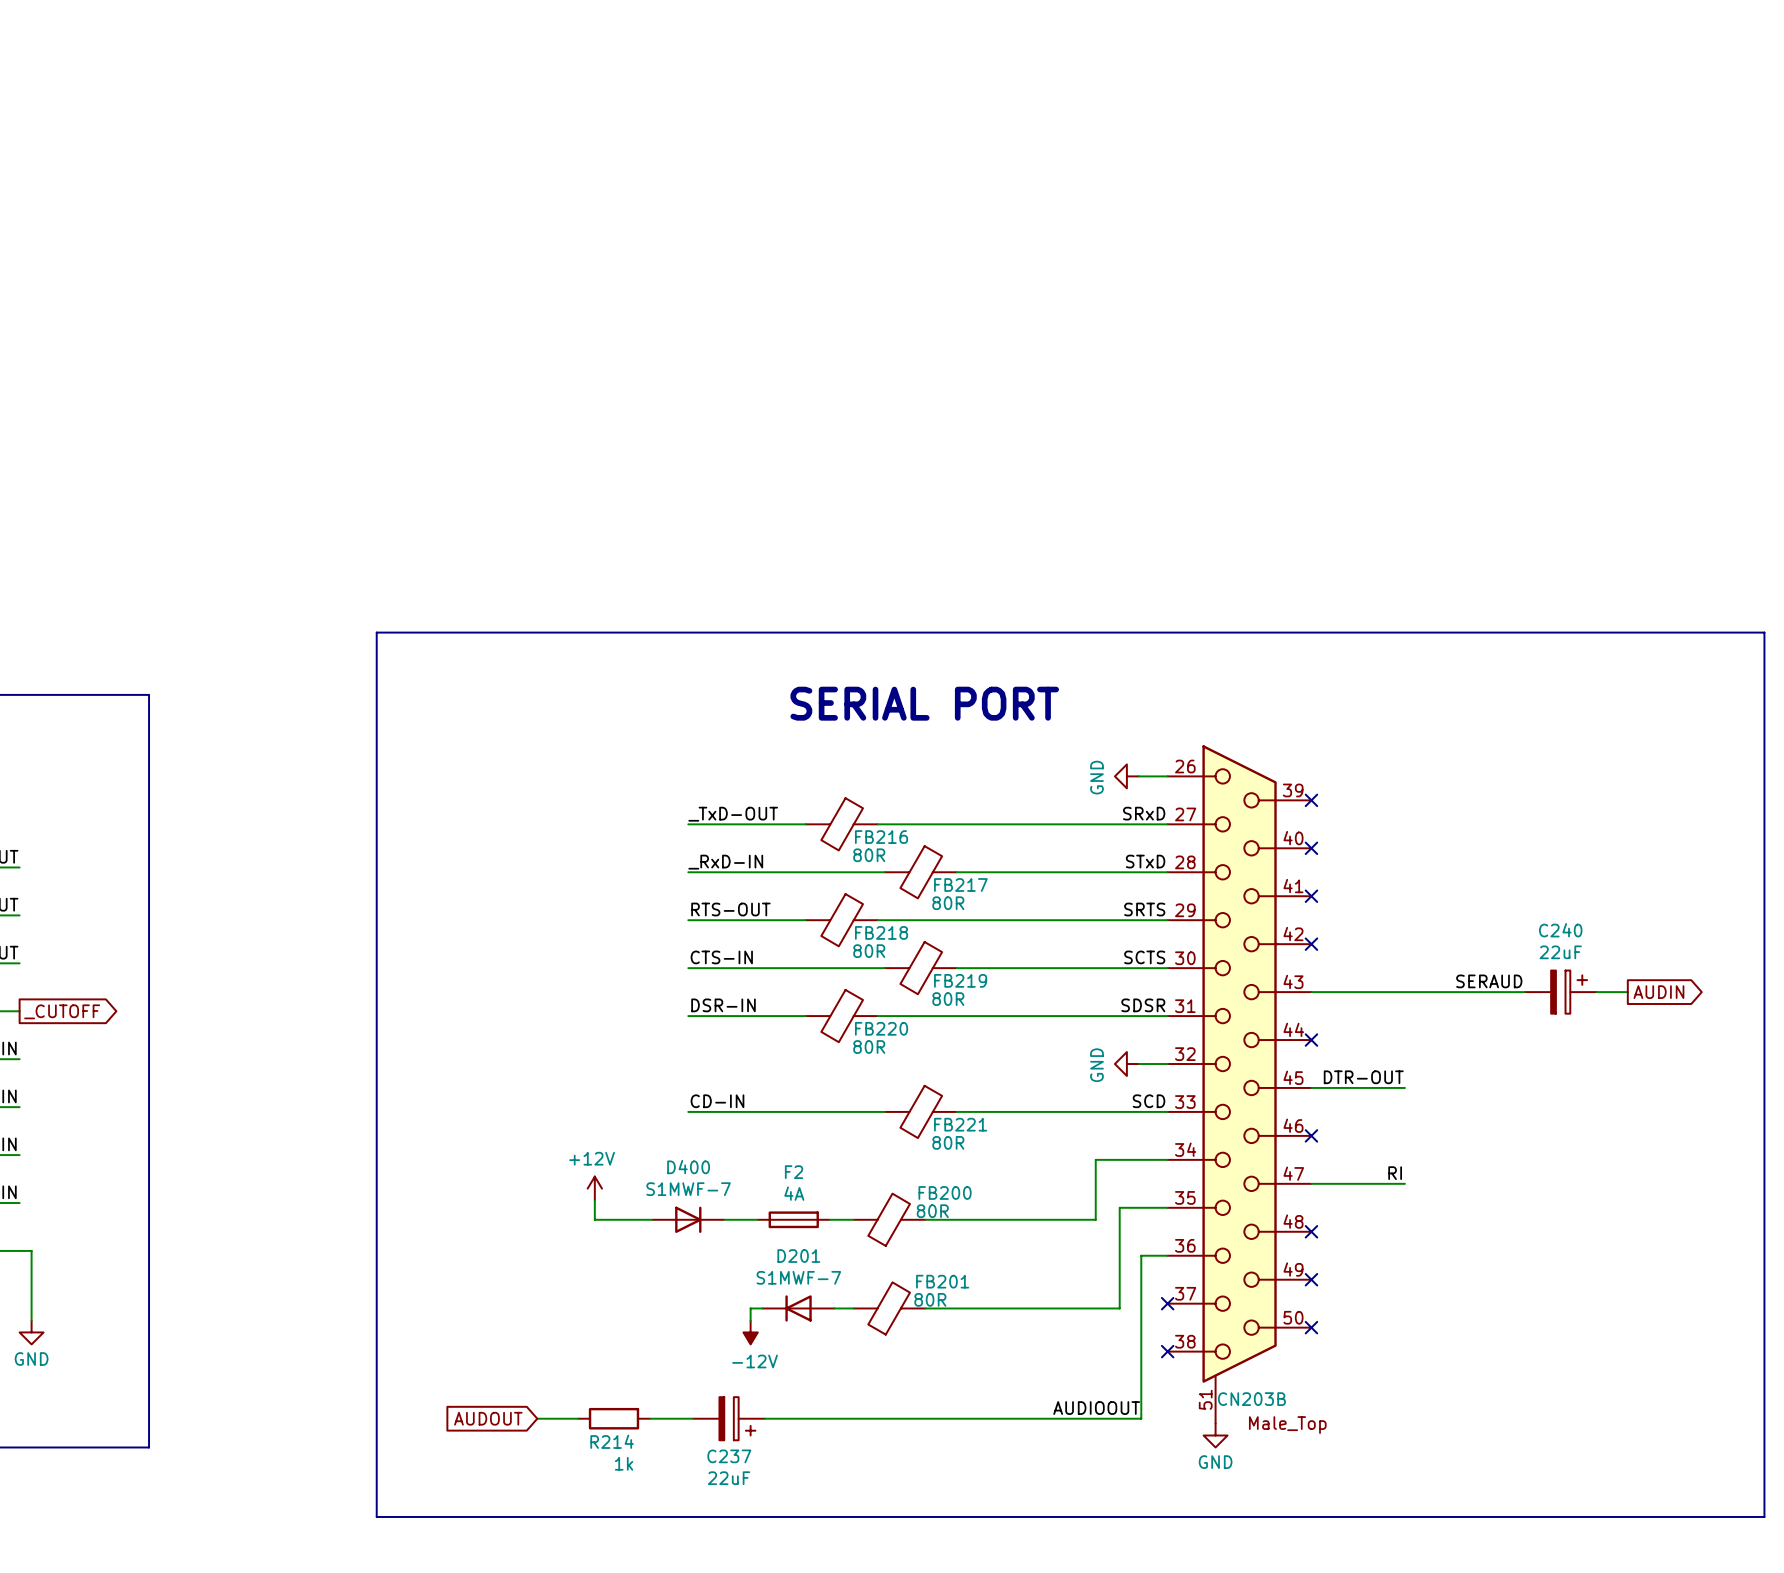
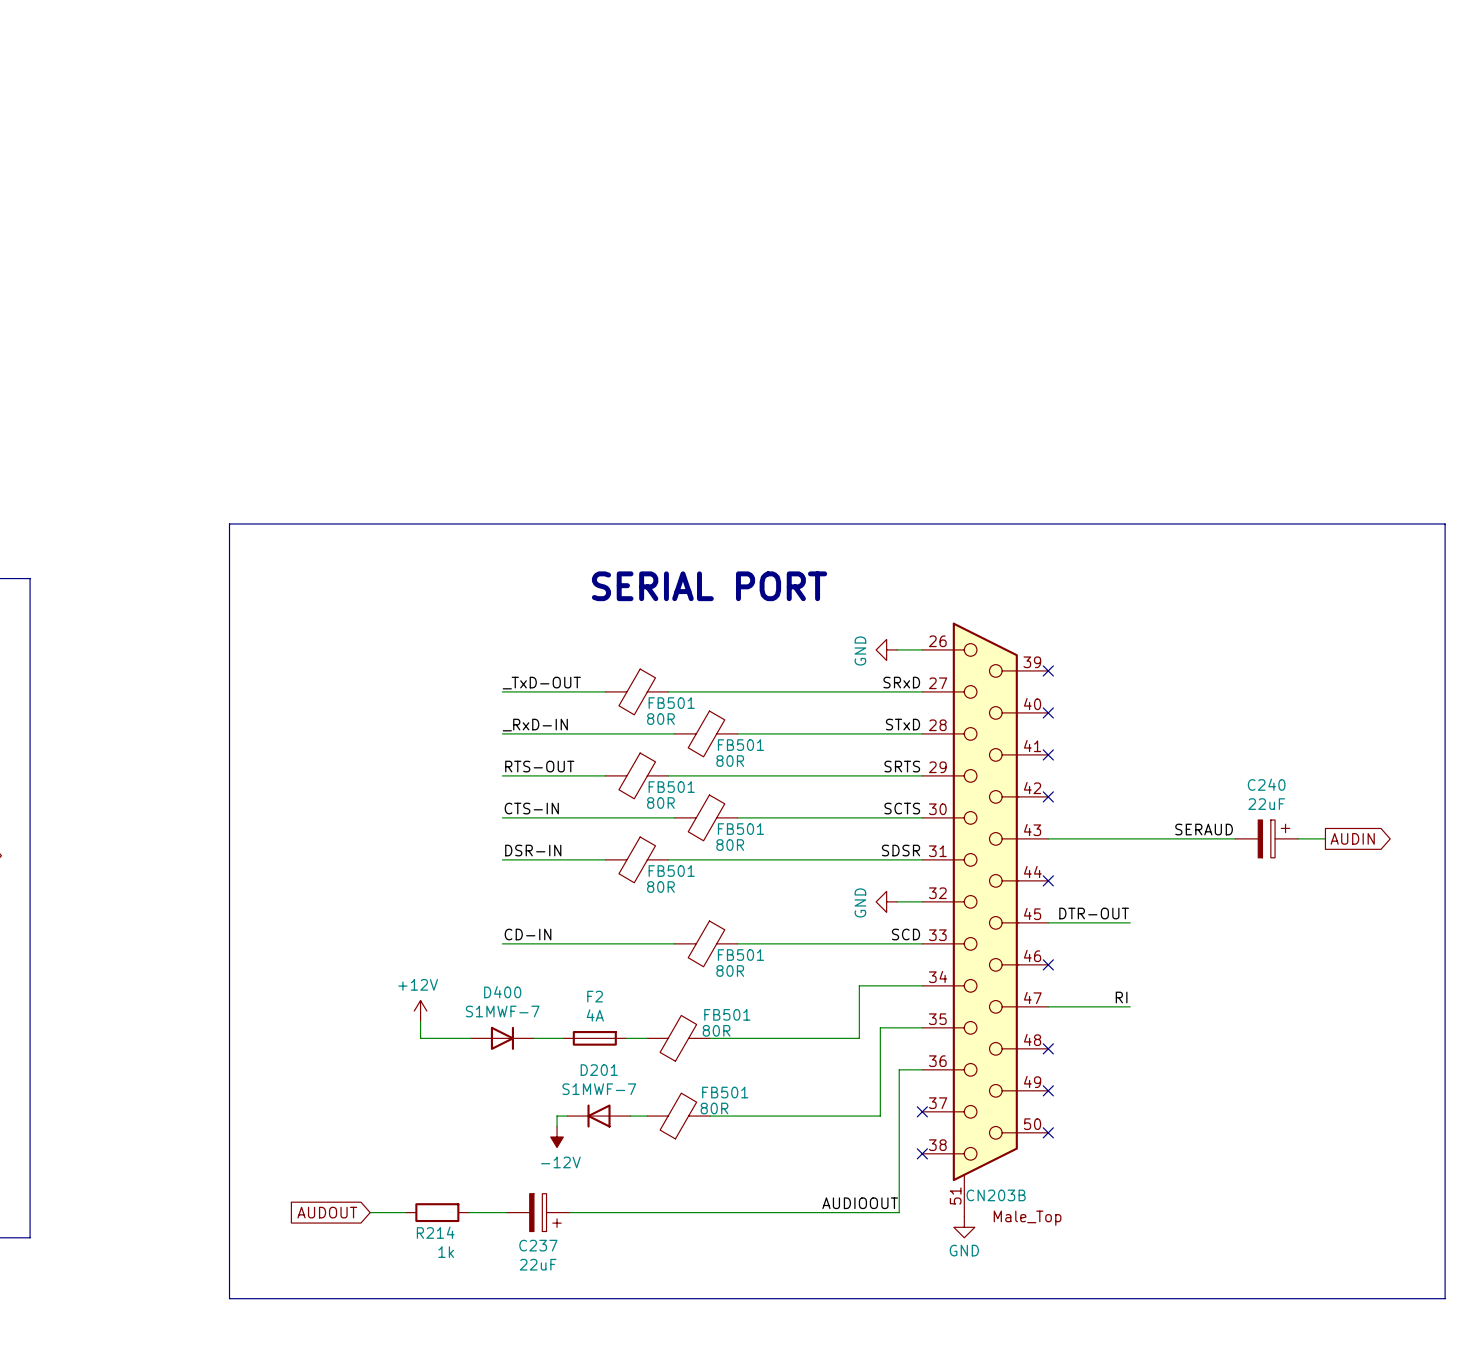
FB216 name: FB216 (881, 837) -> FB501 (671, 703)
FB217 name: FB217 (960, 885) -> FB501 (740, 745)
FB218 name: FB218 (881, 932) -> FB501 (671, 787)
FB219 name: FB219 (960, 980) -> FB501 (740, 829)
FB220 name: FB220 (881, 1028) -> FB501 (671, 871)
FB221 name: FB221 (960, 1124) -> FB501 (740, 955)
FB200 name: FB200 (945, 1192) -> FB501 (727, 1014)
FB201 name: FB201 (942, 1281) -> FB501 (725, 1092)

